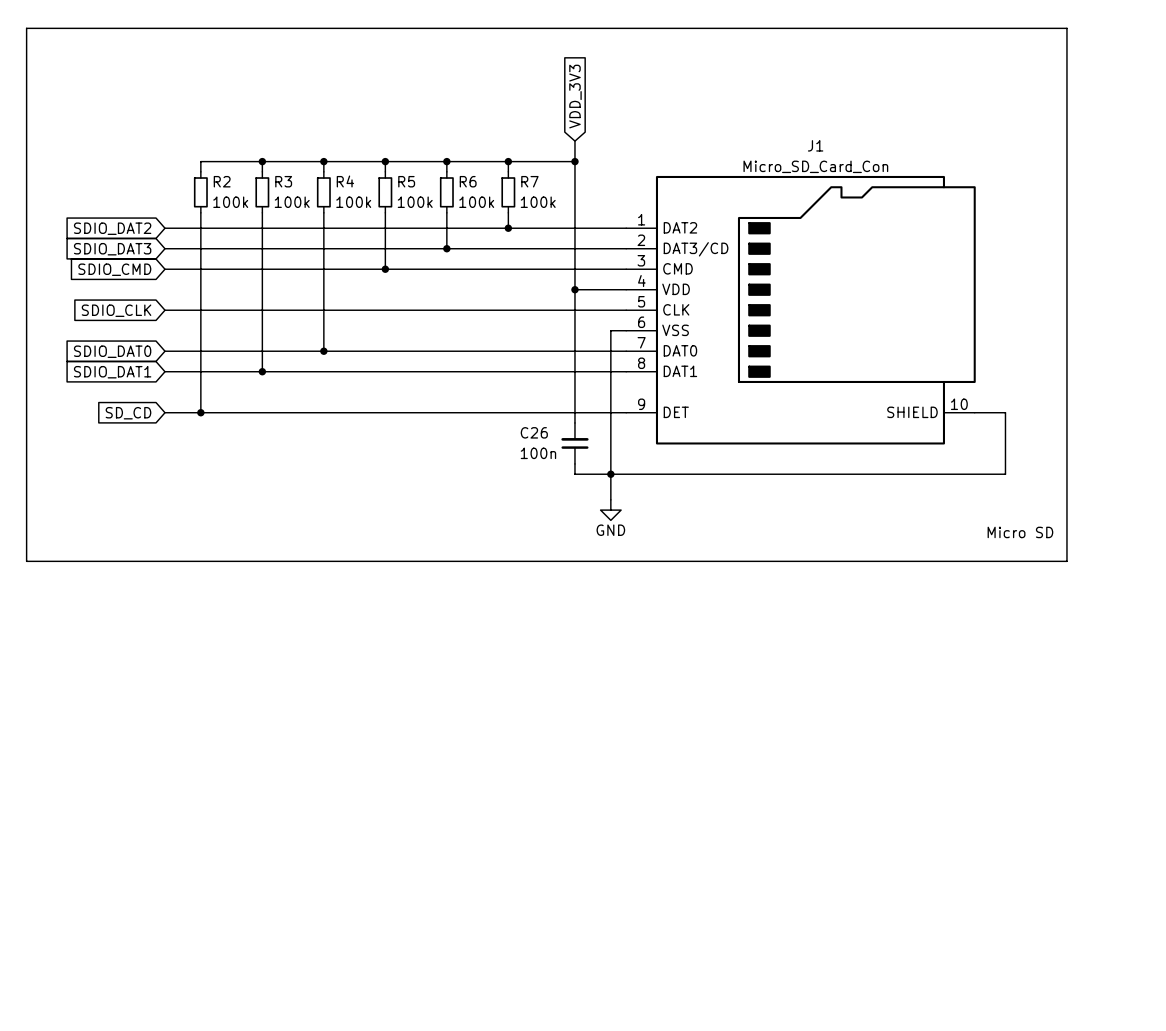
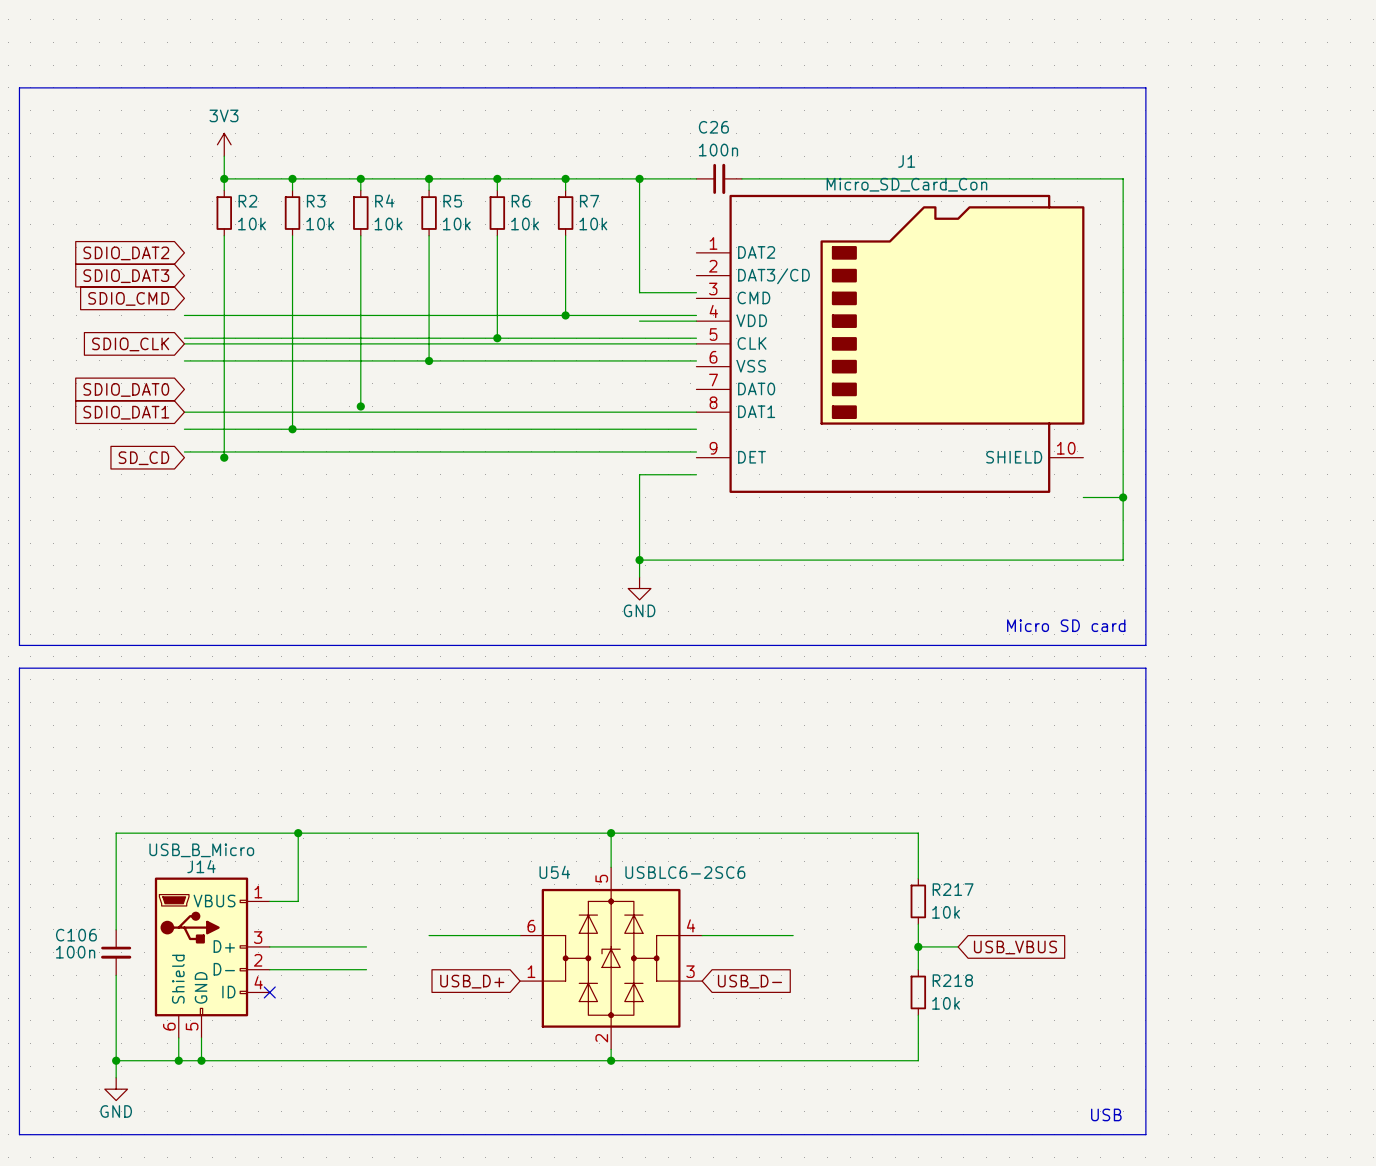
line: (26, 28) (1066, 28) (1066, 561) (26, 561) (26, 28) -> (19, 87) (19, 645) (1145, 645) (1145, 87) (19, 87)
global label: VDD_3V3 (575, 96) -> none
power symbol: none -> 3V3 (224, 144)
wire: none -> (224, 156) (224, 178)
wire: (574, 141) (574, 161) -> (696, 178) (639, 178)
junction: none -> (224, 178)
wire: none -> (741, 178) (1123, 178) (1123, 560) (639, 560)
R2 value: 100k (230, 202) -> 10k (251, 224)
R3 value: 100k (292, 202) -> 10k (320, 224)
R4 value: 100k (353, 202) -> 10k (388, 224)
R5 value: 100k (415, 202) -> 10k (456, 224)
R6 value: 100k (476, 202) -> 10k (525, 224)
R7 value: 100k (538, 202) -> 10k (593, 224)
wire: (164, 228) (626, 228) -> (184, 315) (696, 315)
wire: none -> (565, 252) (565, 315)
junction: (508, 228) -> none
wire: (164, 248) (626, 248) -> (184, 338) (696, 338)
wire: none -> (497, 275) (497, 338)
junction: (446, 248) -> none
wire: (574, 264) (574, 422) -> (639, 292) (696, 292)
wire: (164, 269) (626, 269) -> (184, 360) (696, 360)
wire: none -> (429, 298) (429, 360)
junction: (385, 269) -> none
junction: none -> (565, 315)
junction: (574, 289) -> none
junction: none -> (497, 338)
junction: none -> (429, 360)
wire: (626, 330) (610, 330) (610, 499) -> none
wire: (164, 351) (626, 351) -> (184, 451) (696, 451)
wire: none -> (360, 389) (360, 406)
junction position: (323, 351) -> (360, 406)
wire: none -> (292, 412) (292, 429)
junction position: (262, 371) -> (292, 429)
wire: (164, 412) (626, 412) -> (184, 429) (696, 429)
wire: (974, 412) (1005, 412) (1005, 474) (574, 474) -> (639, 577) (639, 525)
wire: none -> (696, 474) (639, 474) (639, 514)
C26 rotation: 0° (574, 443) -> 90° clockwise (719, 178)
C26 position: (574, 443) -> (719, 178)
wire: none -> (1083, 497) (1123, 497)
junction: none -> (1123, 497)
junction position: (610, 474) -> (639, 560)
power symbol position: GND (610, 510) -> GND (639, 588)
text: Micro SD (1020, 532) -> none
text: none -> Micro SD card (1066, 625)
line: none -> (19, 668) (1145, 668) (1145, 1134) (19, 1134) (19, 668)
wire: none -> (298, 833) (298, 901) (269, 901)
junction: none -> (298, 833)
wire: none -> (611, 833) (611, 867)
junction: none -> (611, 833)
wire: none -> (918, 878) (918, 833) (116, 833) (116, 929)
R217: none -> 10k (918, 901)
wire: none -> (918, 924) (918, 969)
wire: none -> (429, 935) (520, 935)
wire: none -> (702, 935) (793, 935)
wire: none -> (269, 946) (366, 946)
wire: none -> (918, 946) (958, 946)
junction: none -> (918, 946)
global label: none -> USB_VBUS (1015, 947)
C106: none -> 100n (116, 952)
J14: none -> USB_B_Micro (212, 957)
U54: none -> USBLC6-2SC6 (611, 958)
wire: none -> (269, 969) (366, 969)
wire: none -> (116, 975) (116, 1077)
global label: none -> USB_D+ (472, 981)
global label: none -> USB_D- (749, 981)
no-connect mark: none -> (269, 992)
R218: none -> 10k (918, 992)
wire: none -> (918, 1015) (918, 1060) (116, 1060)
wire: none -> (178, 1037) (178, 1060)
wire: none -> (201, 1037) (201, 1060)
wire: none -> (611, 1049) (611, 1060)
junction: none -> (116, 1060)
junction: none -> (178, 1060)
junction: none -> (201, 1060)
junction: none -> (611, 1060)
power symbol: none -> GND (116, 1089)
text: none -> USB (1106, 1114)

